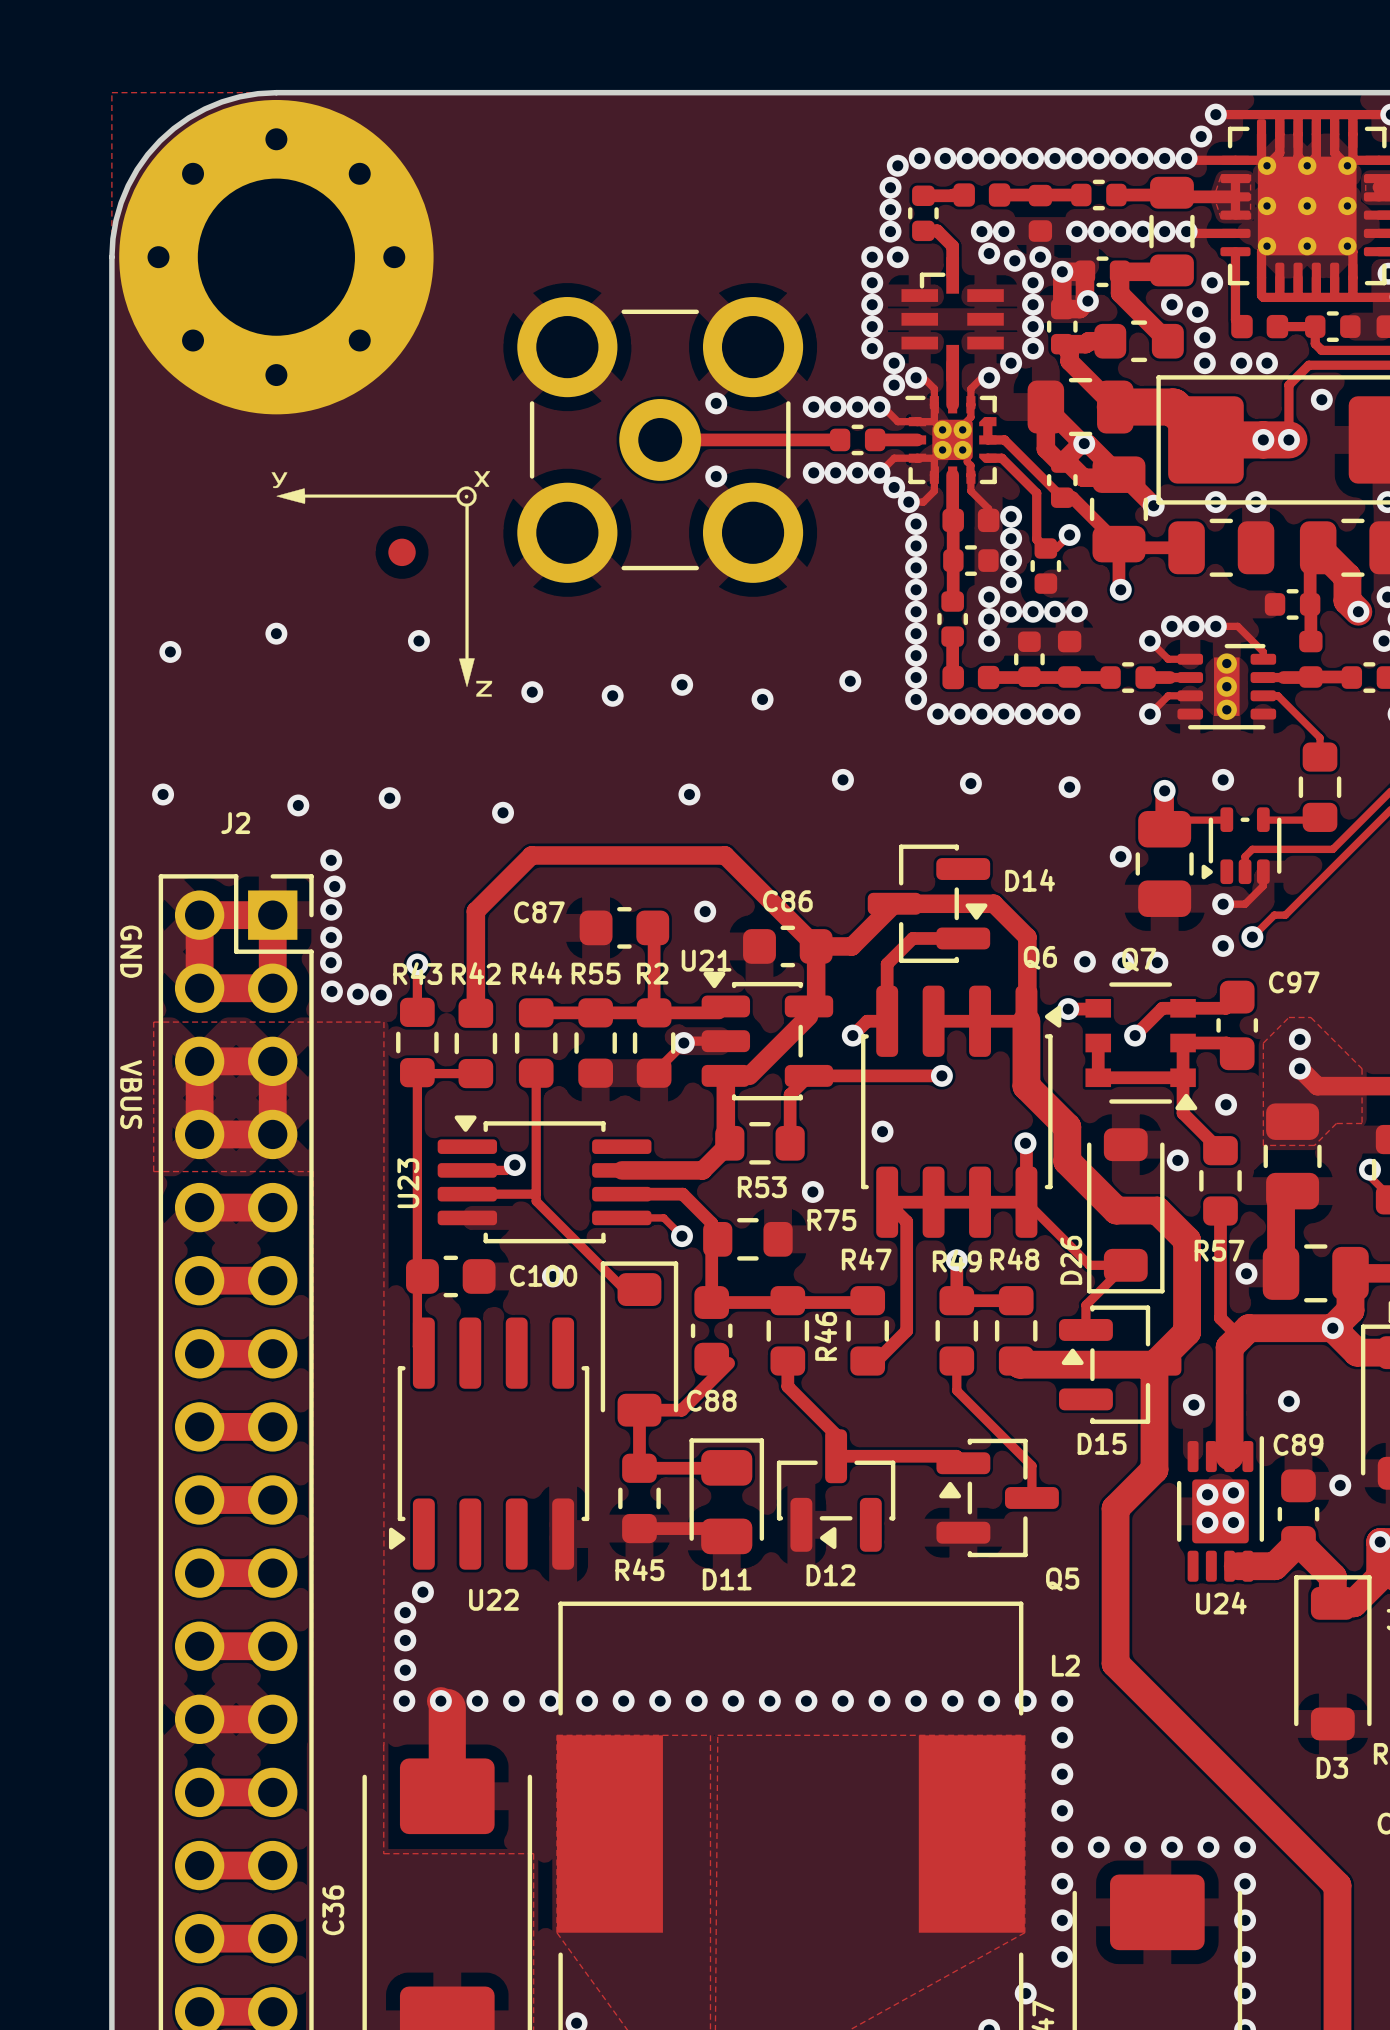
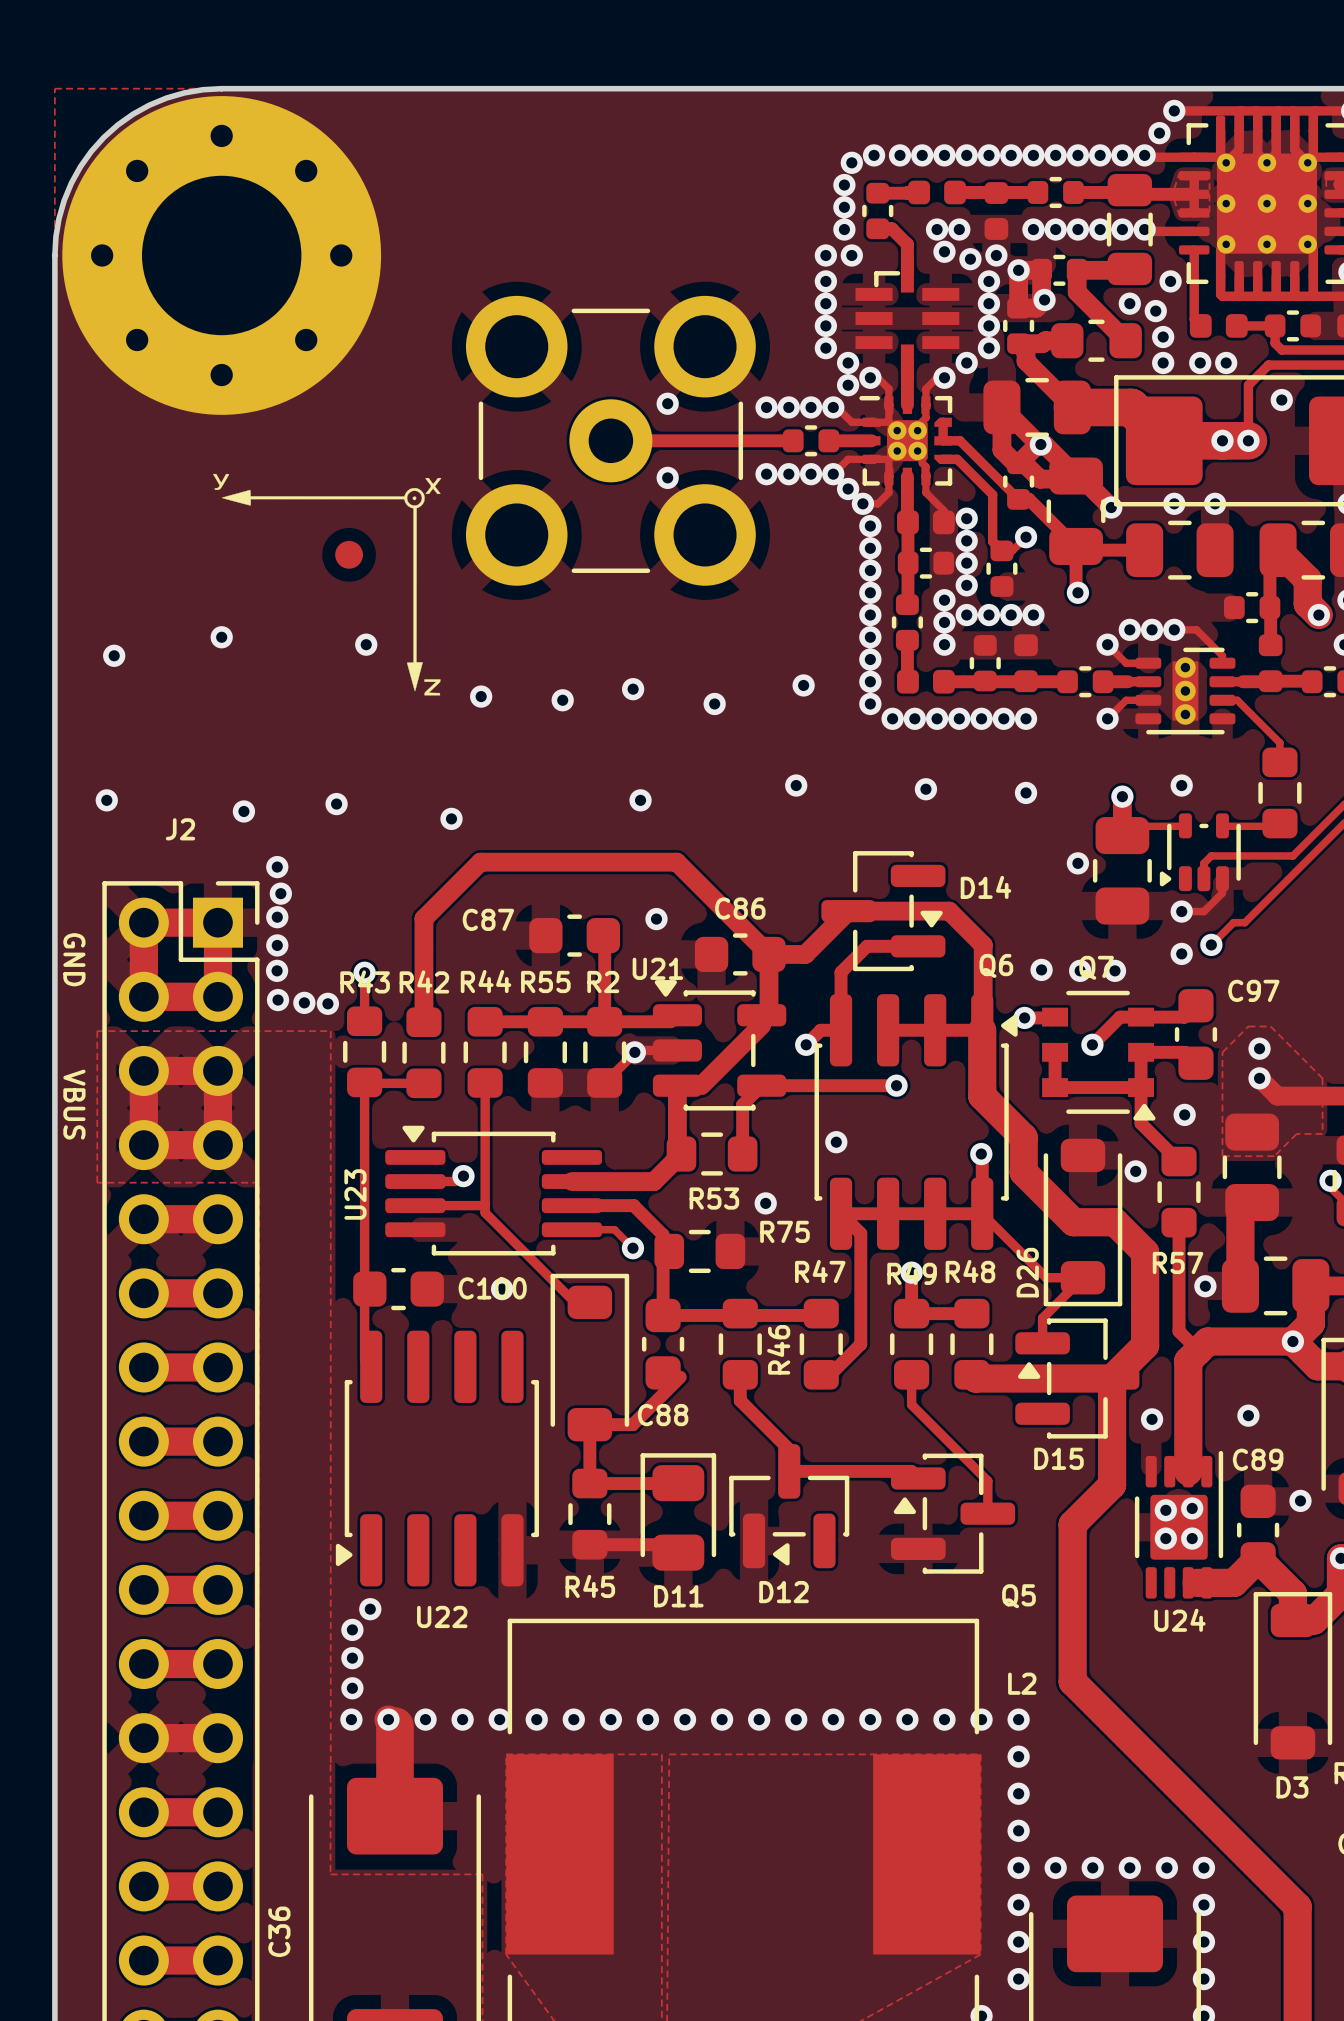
drawing shape: [271, 471, 493, 697] -> [213, 473, 442, 696]

